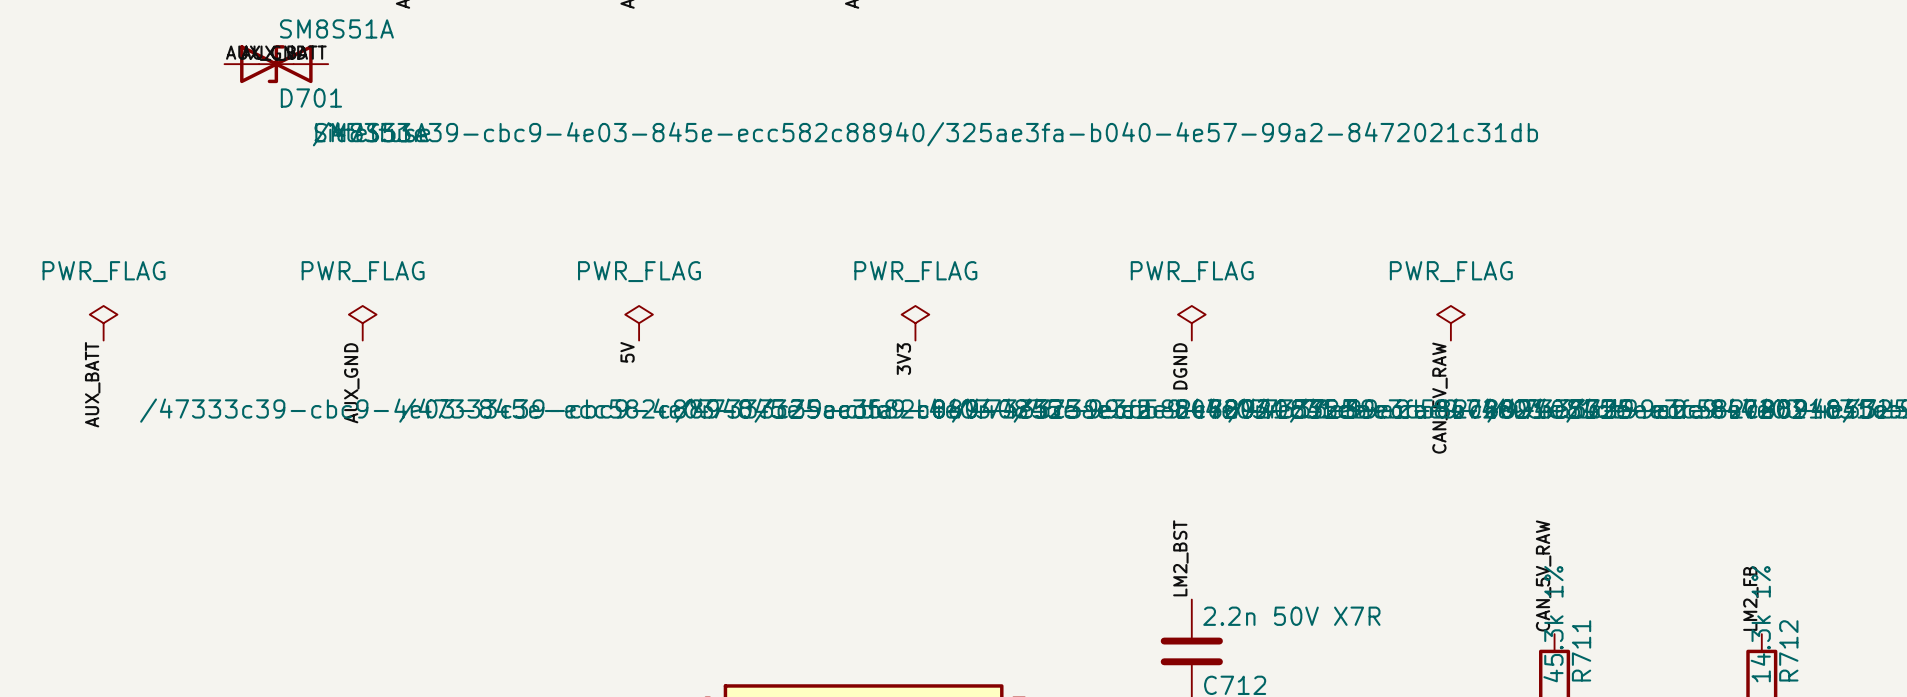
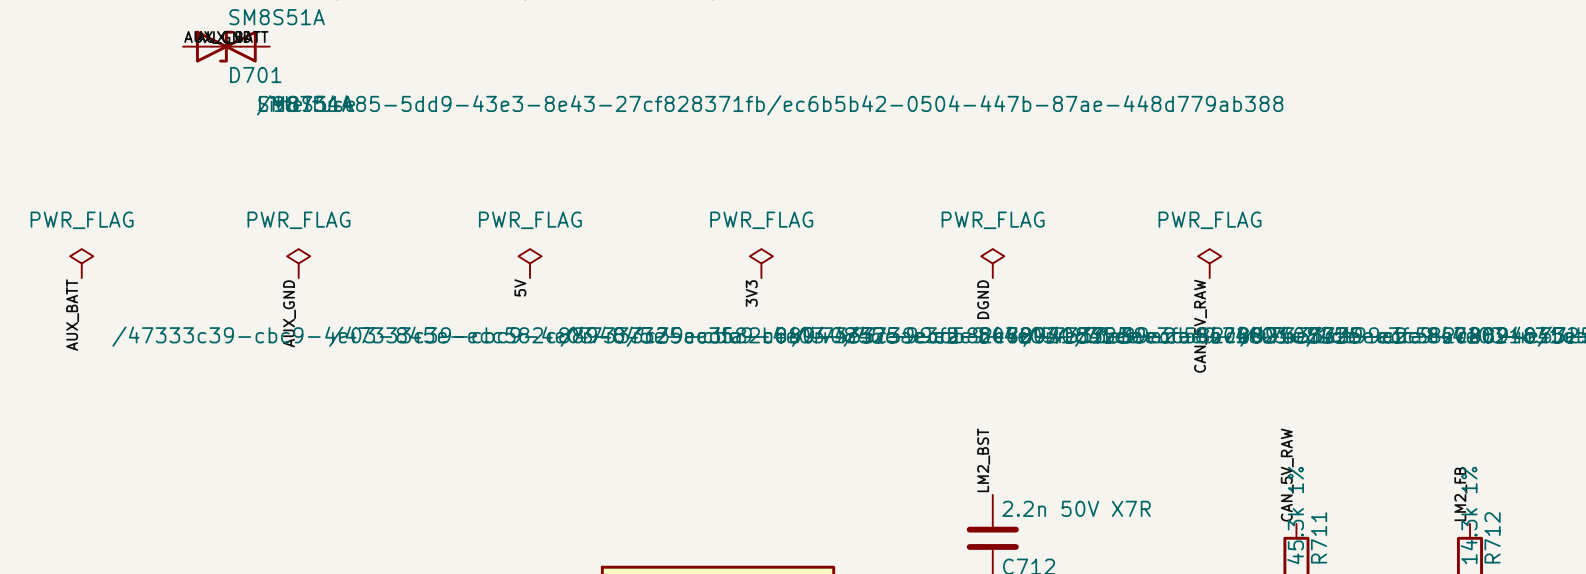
D701 text: /47333c39-cbc9-4e03-845e-ecc582c88940/325ae3fa-b040-4e57-99a2-8472021c31db (925, 134) -> /98734485-5dd9-43e3-8e43-27cf828371fb/ec6b5b42-0504-447b-87ae-448d779ab388 (770, 105)

